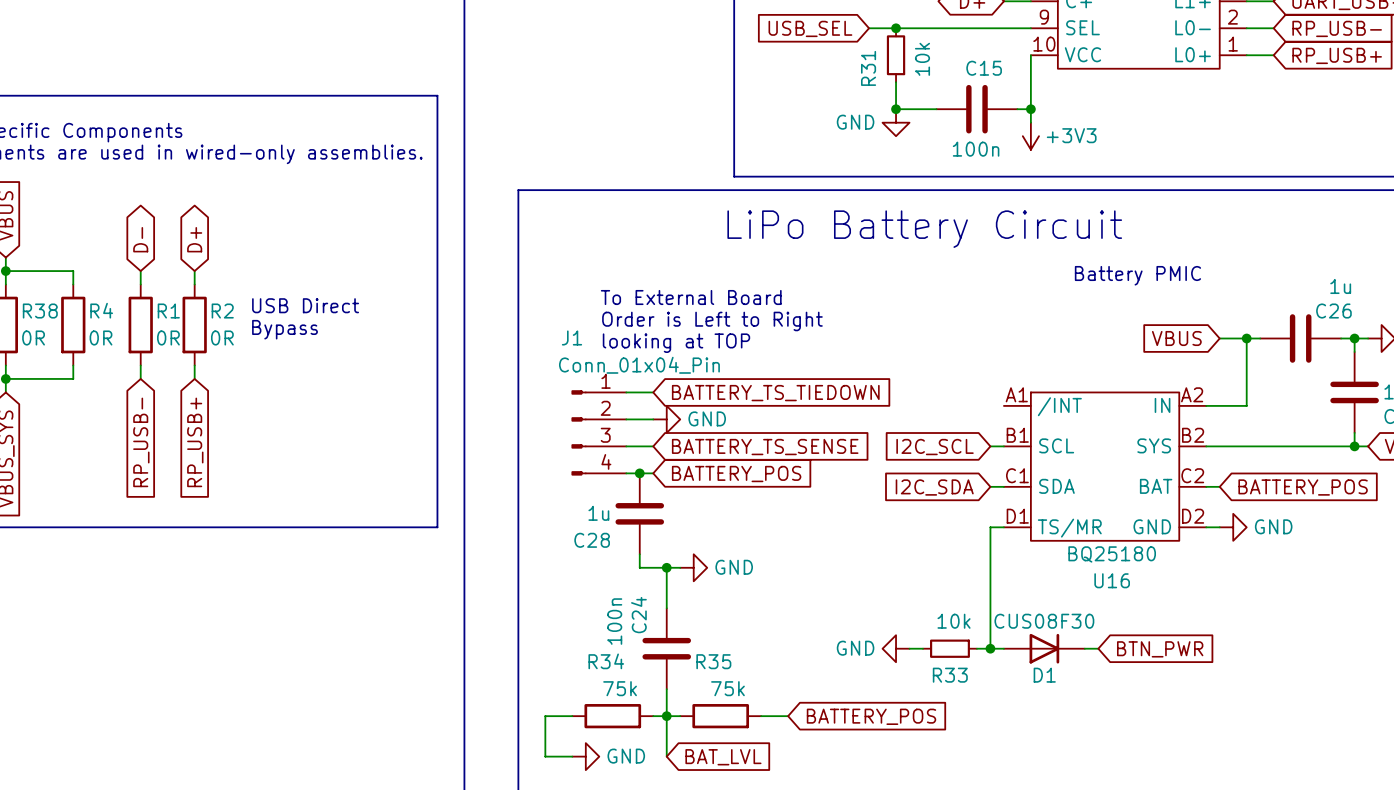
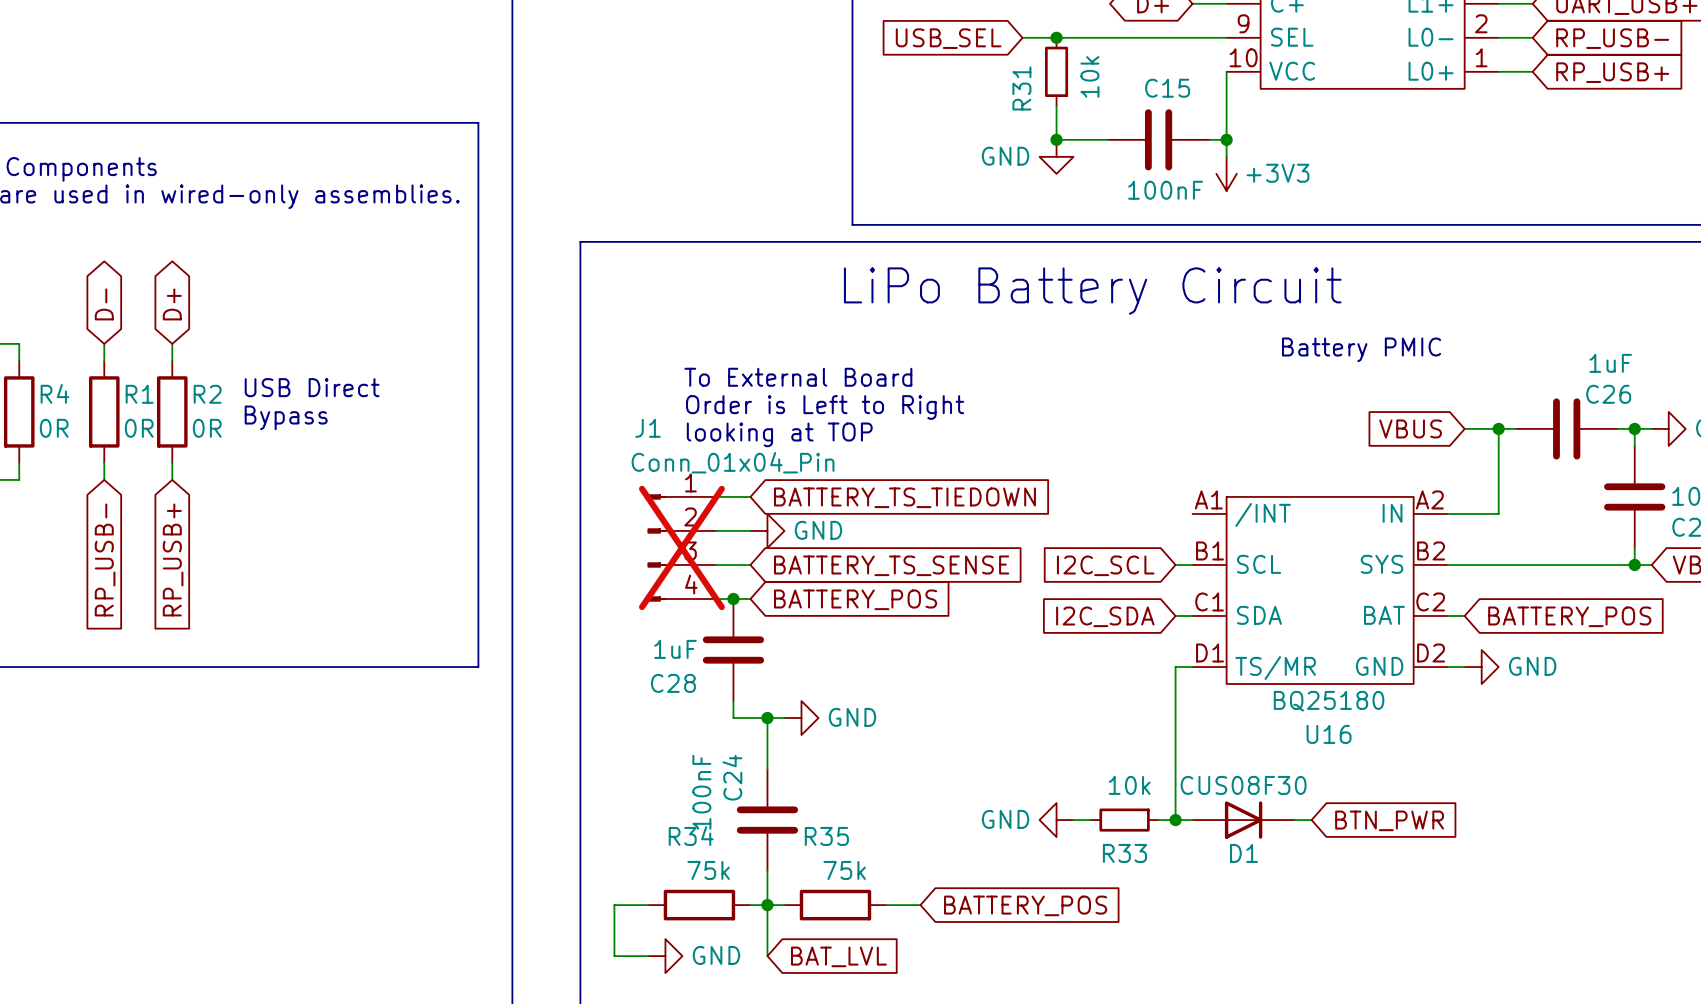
C15 value: 100n (976, 149) -> 100nF (1165, 190)
C26 value: 1u (1340, 286) -> 1uF (1610, 363)
J1 do-not-place cross: none -> (681, 547)
C28 value: 1u (598, 513) -> 1uF (675, 649)
C24 value: 100n (614, 621) -> 100nF (701, 792)

